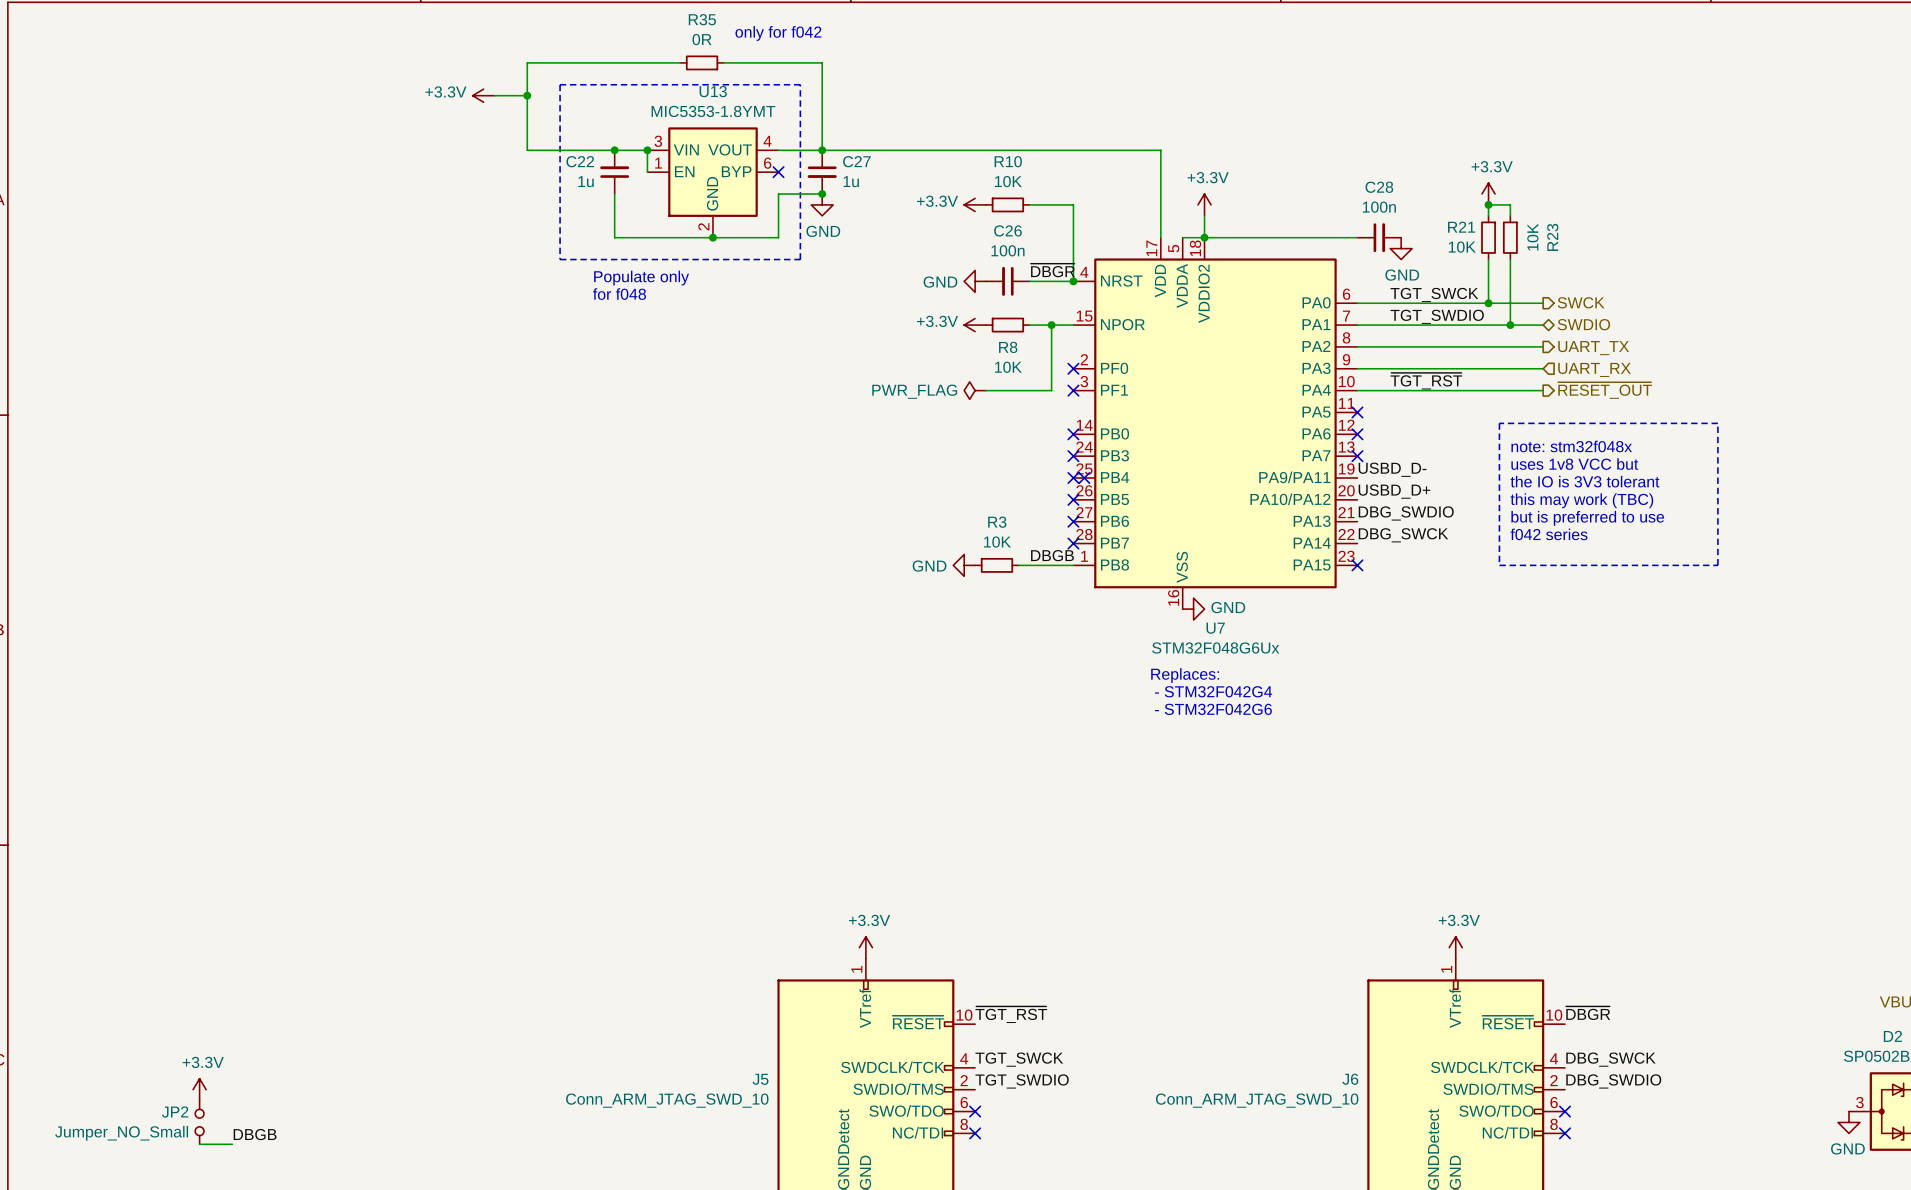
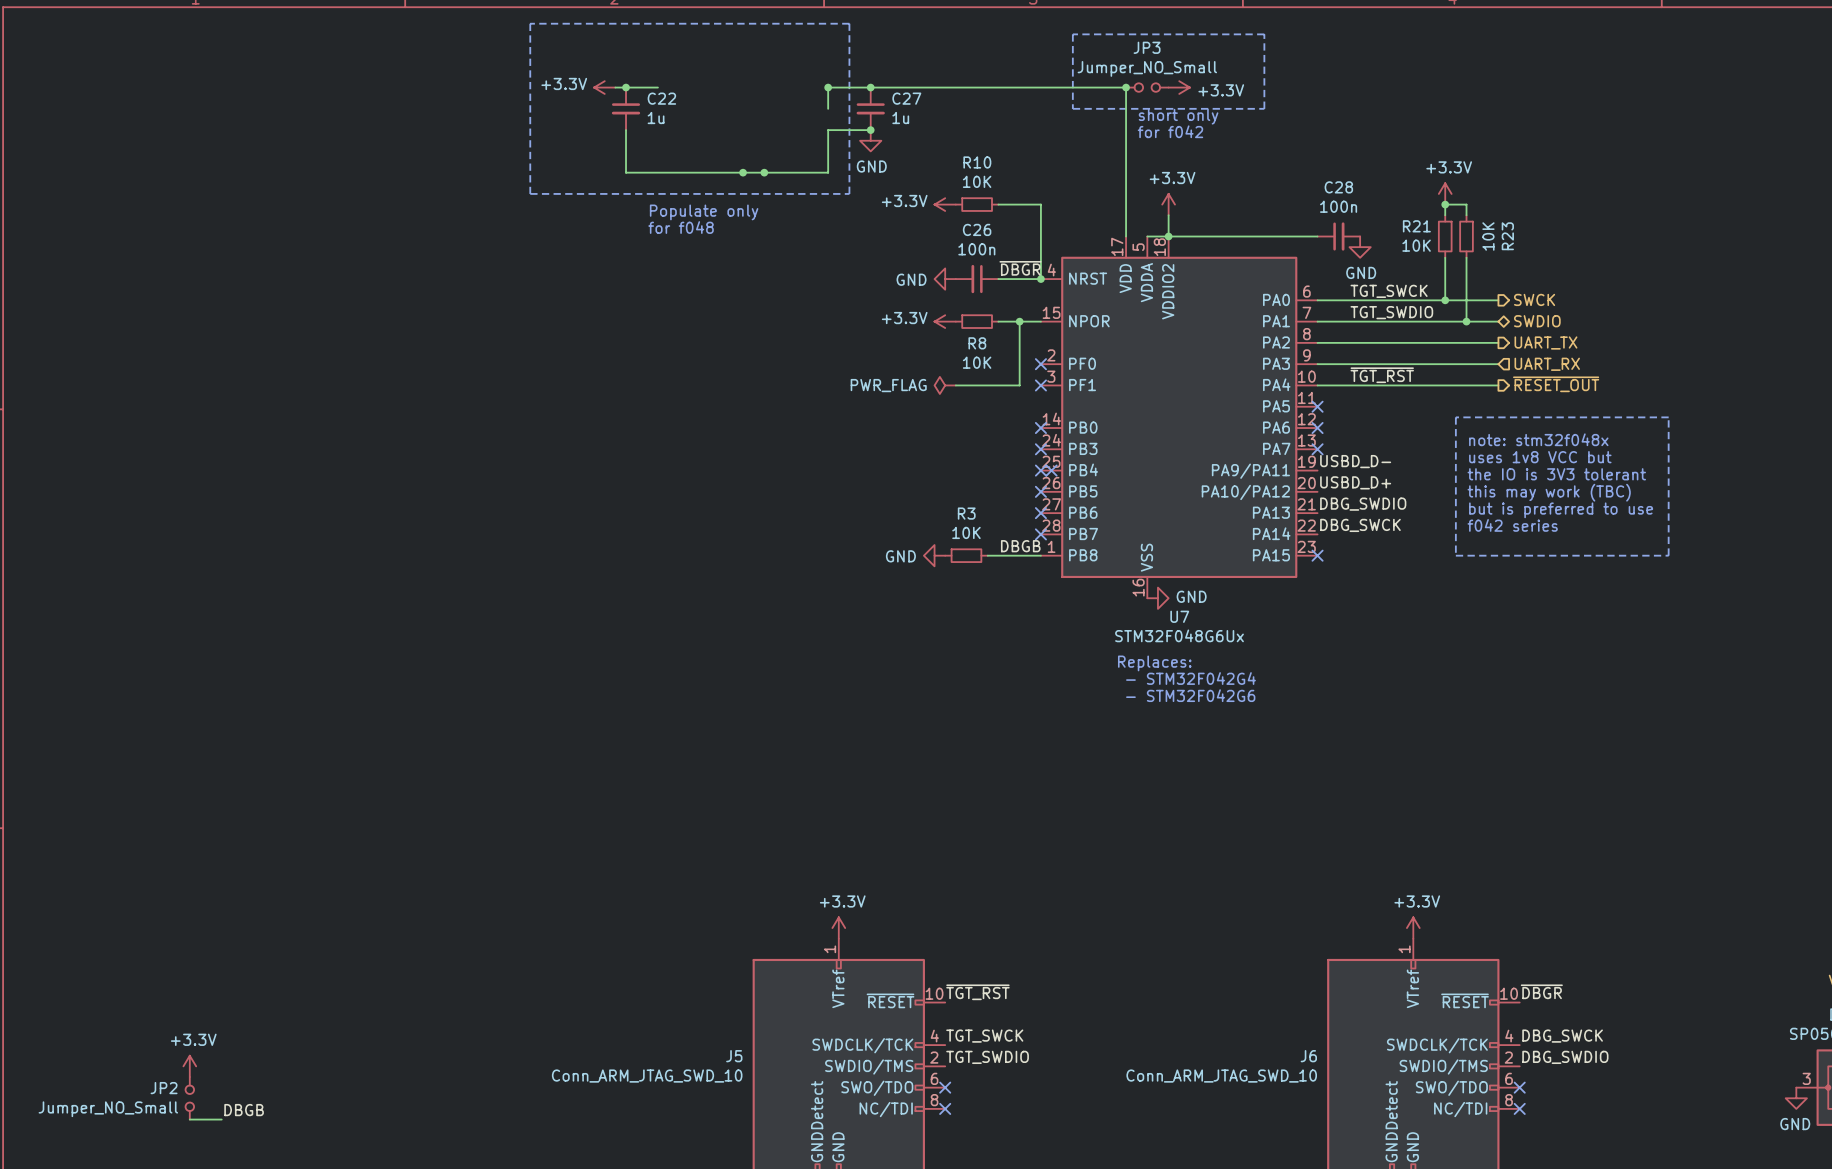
line: none -> (530, 23) (530, 193) (849, 193) (849, 23) (530, 23)
line: none -> (1072, 34) (1264, 34) (1264, 108) (1072, 108) (1072, 34)
text: only for f042 (778, 33) -> none
wire: (680, 62) (527, 62) (527, 150) (647, 150) -> (626, 130) (626, 151)
R35: 0R (702, 62) -> none
wire: (723, 62) (822, 62) (822, 150) -> none
line: (560, 84) (560, 259) (800, 259) (800, 84) (560, 84) -> none
junction: none -> (626, 87)
junction: none -> (828, 87)
junction: none -> (870, 87)
junction: none -> (1126, 87)
JP3: none -> Jumper_NO_Small (1147, 87)
power symbol: none -> +3.3V (1179, 87)
power symbol position: +3.3V (483, 95) -> +3.3V (604, 87)
wire: (494, 95) (527, 95) -> none
junction: (527, 95) -> none
text: none -> short only (1178, 116)
wire: none -> (870, 130) (828, 130) (828, 172) (626, 172)
junction: none -> (870, 130)
text: none -> for f042 (1170, 131)
junction: (614, 150) -> none
junction: (647, 150) -> none
wire: (778, 150) (1160, 150) -> (828, 108) (828, 87) (1126, 87) (1126, 151)
junction: (822, 150) -> none
C22 name position: C22 (580, 161) -> C22 (661, 98)
C22 rotation: 0° (614, 172) -> 180° (626, 108)
C22 position: (614, 172) -> (626, 108)
junction: none -> (743, 172)
no-connect mark: (778, 172) -> none
junction: none -> (764, 172)
C27 position: (822, 172) -> (870, 108)
C22 value position: 1u (586, 181) -> 1u (656, 118)
U13: MIC5353-1.8YMT (712, 182) -> none
wire: (614, 193) (614, 237) (778, 237) (778, 193) (822, 193) -> none
junction: (822, 193) -> none
power symbol position: GND (822, 204) -> GND (870, 140)
junction: (712, 237) -> none
text position: Populate only (641, 278) -> Populate only (704, 212)
text position: for f048 (619, 294) -> for f048 (681, 227)

